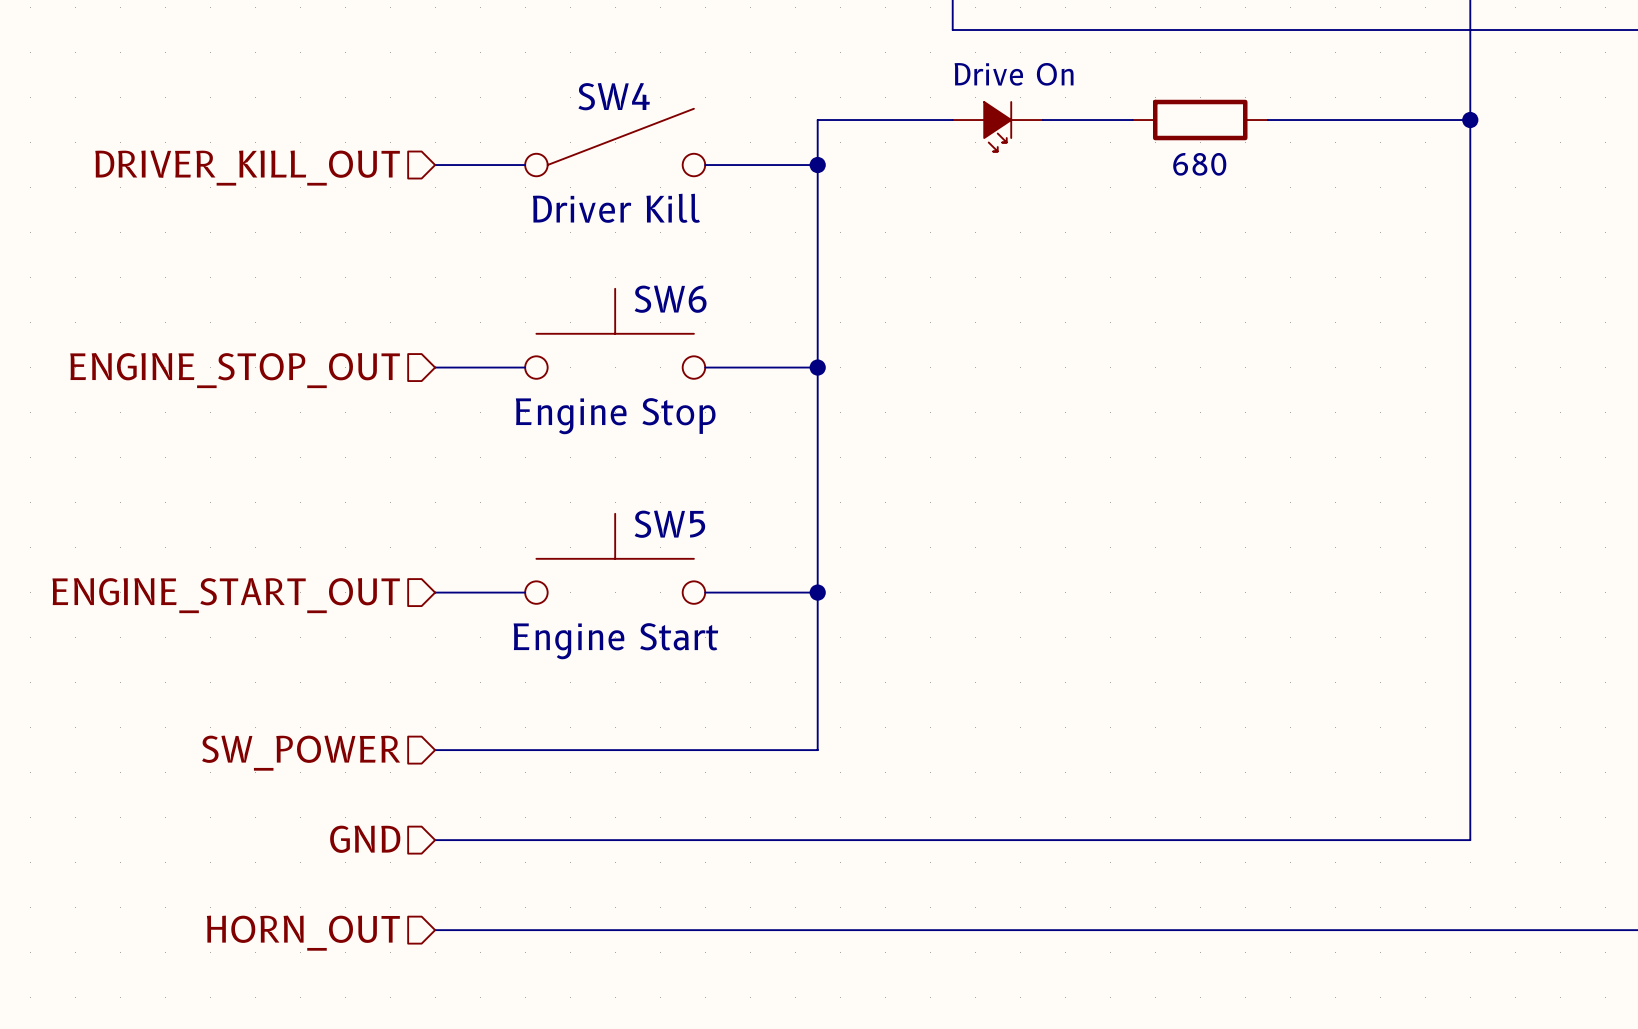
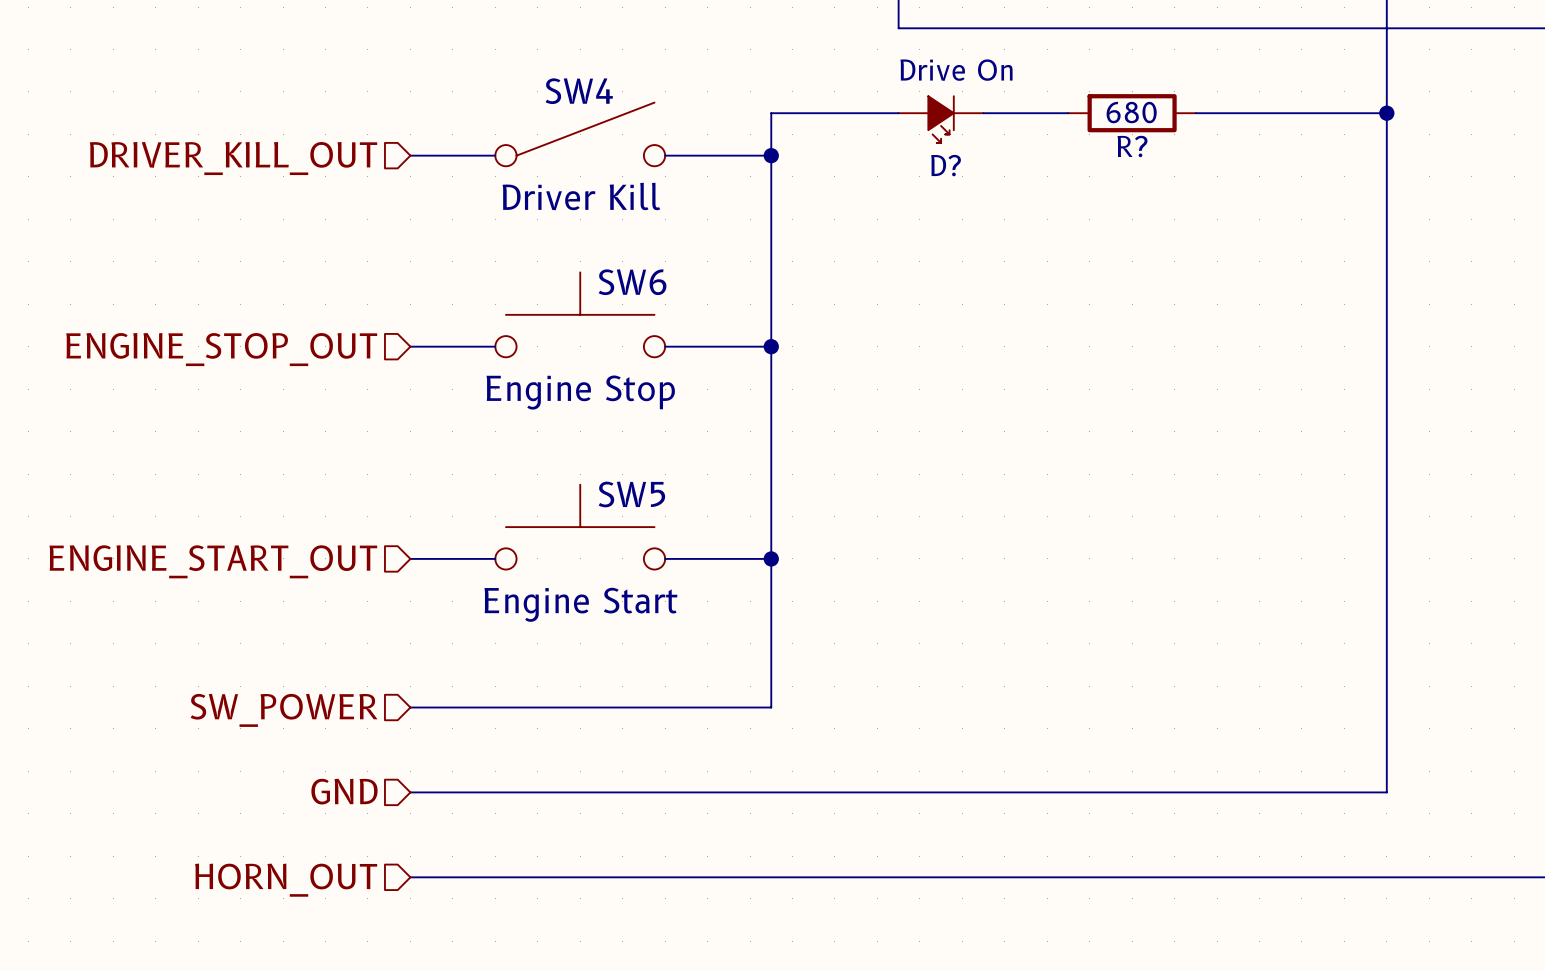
R? name: none -> R? (1132, 146)
R? value position: 680 (1199, 164) -> 680 (1131, 112)
D? name: none -> D? (946, 165)

